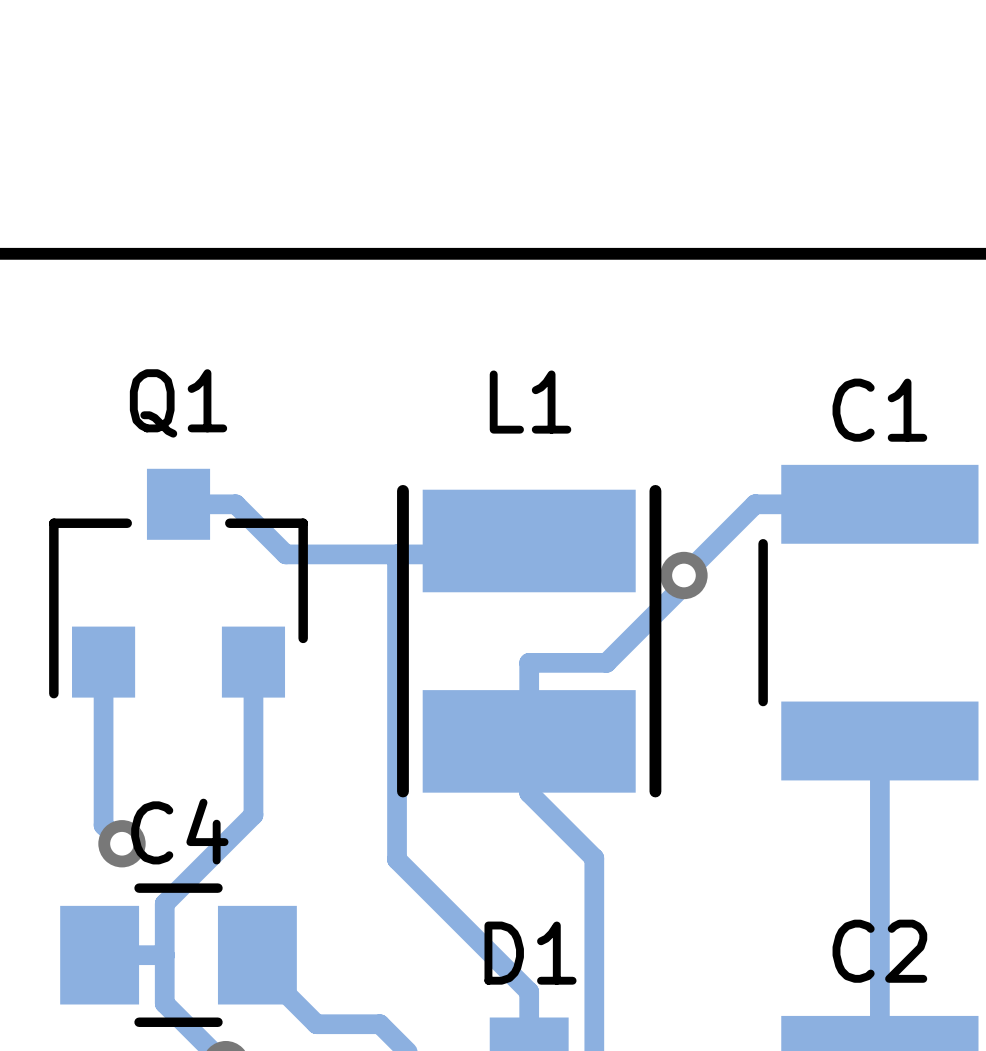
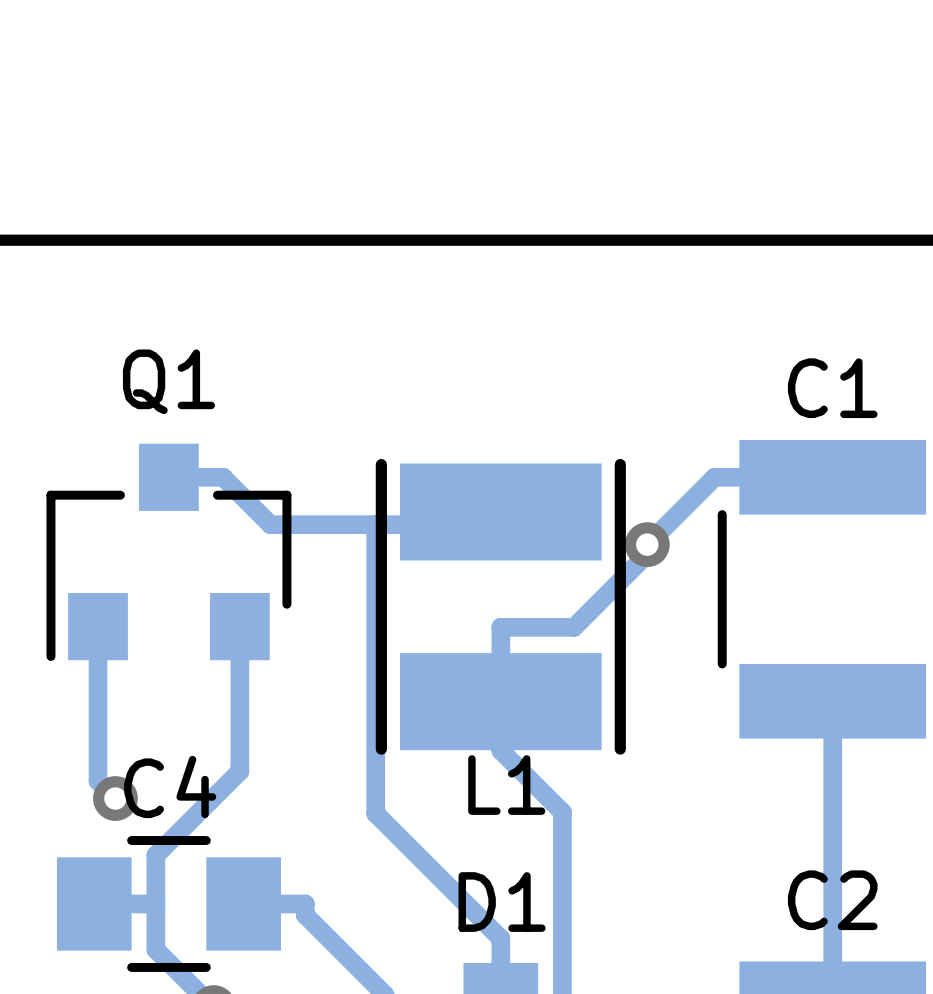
L1 name position: L1 (530, 402) -> L1 (506, 785)
track: (257, 955) (257, 965) (316, 1024) (379, 1024) -> (243, 903) (305, 903) (305, 914) (359, 969)

